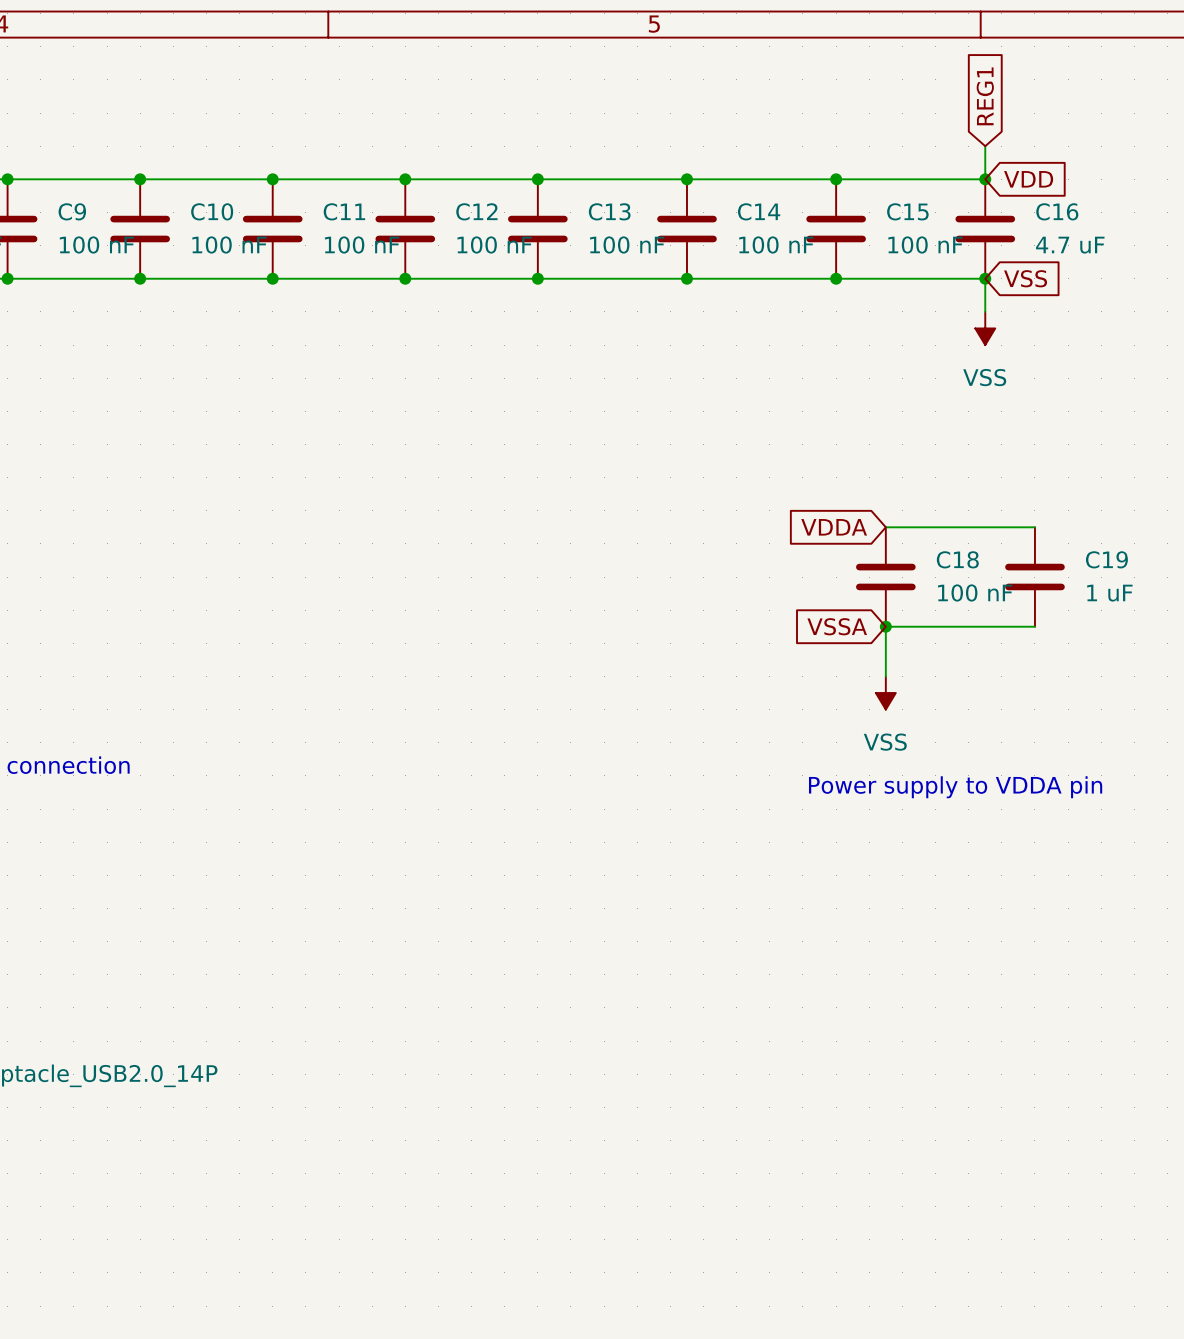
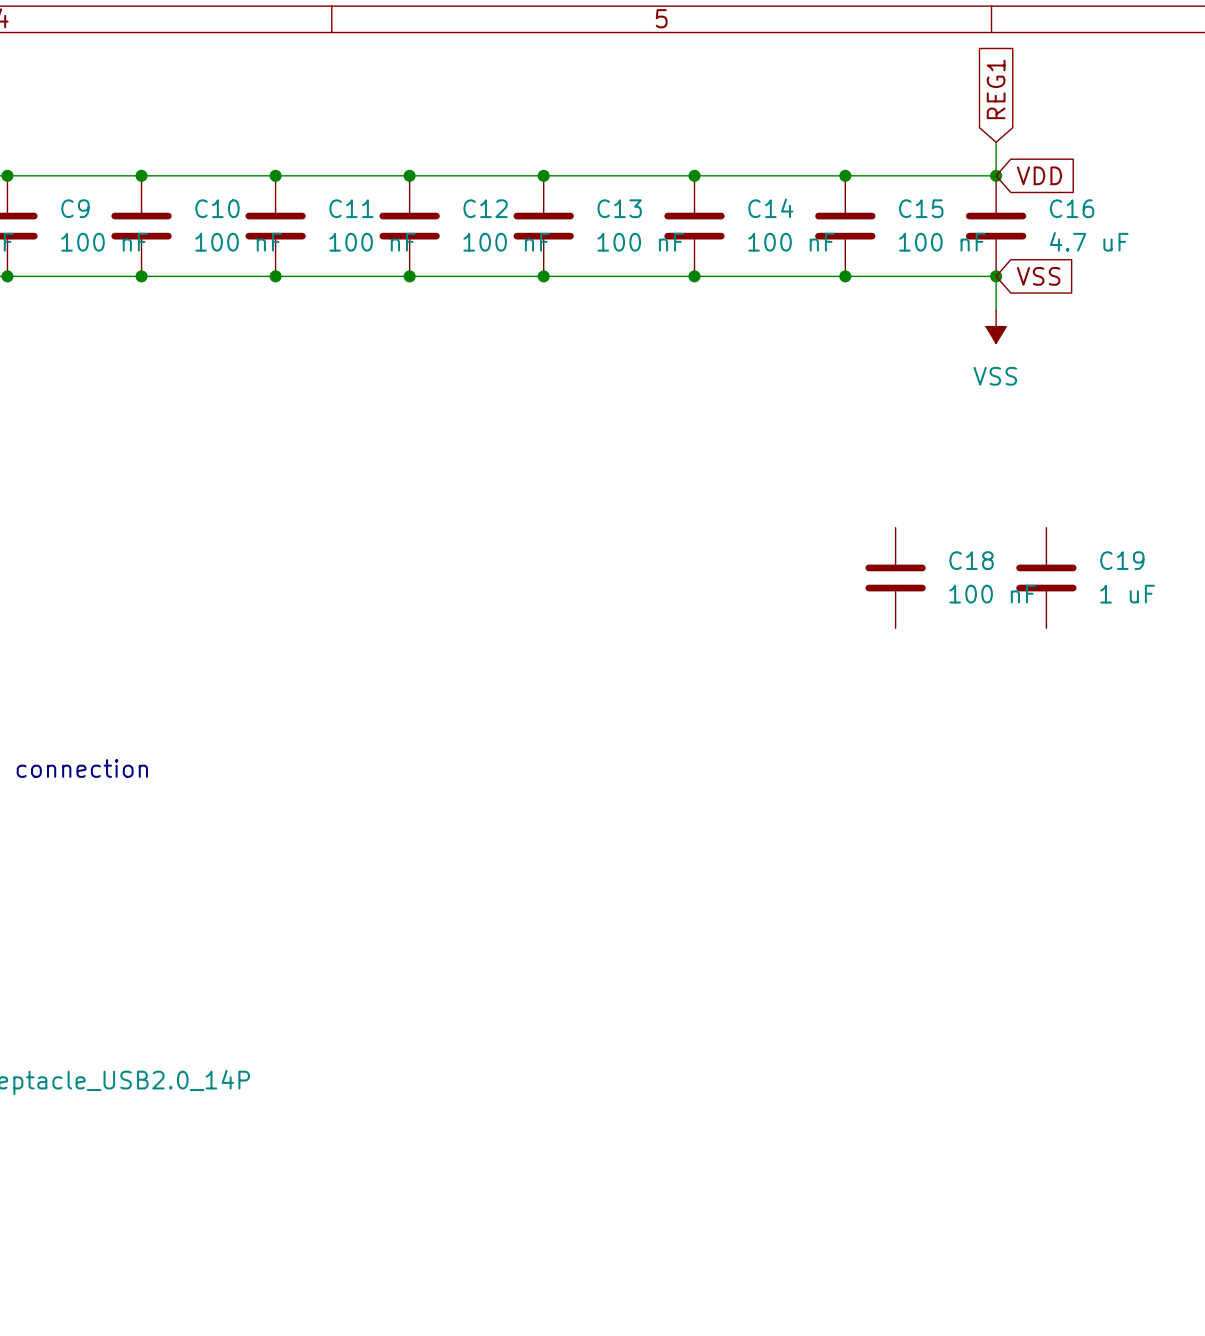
global label: VDDA (834, 527) -> none
wire: (885, 527) (1034, 527) -> none
global label: VSSA (837, 626) -> none
junction: (885, 626) -> none
wire: (1034, 626) (885, 626) (885, 676) -> none
power symbol: VSS (885, 693) -> none
text: Power supply to VDDA pin (955, 787) -> none

